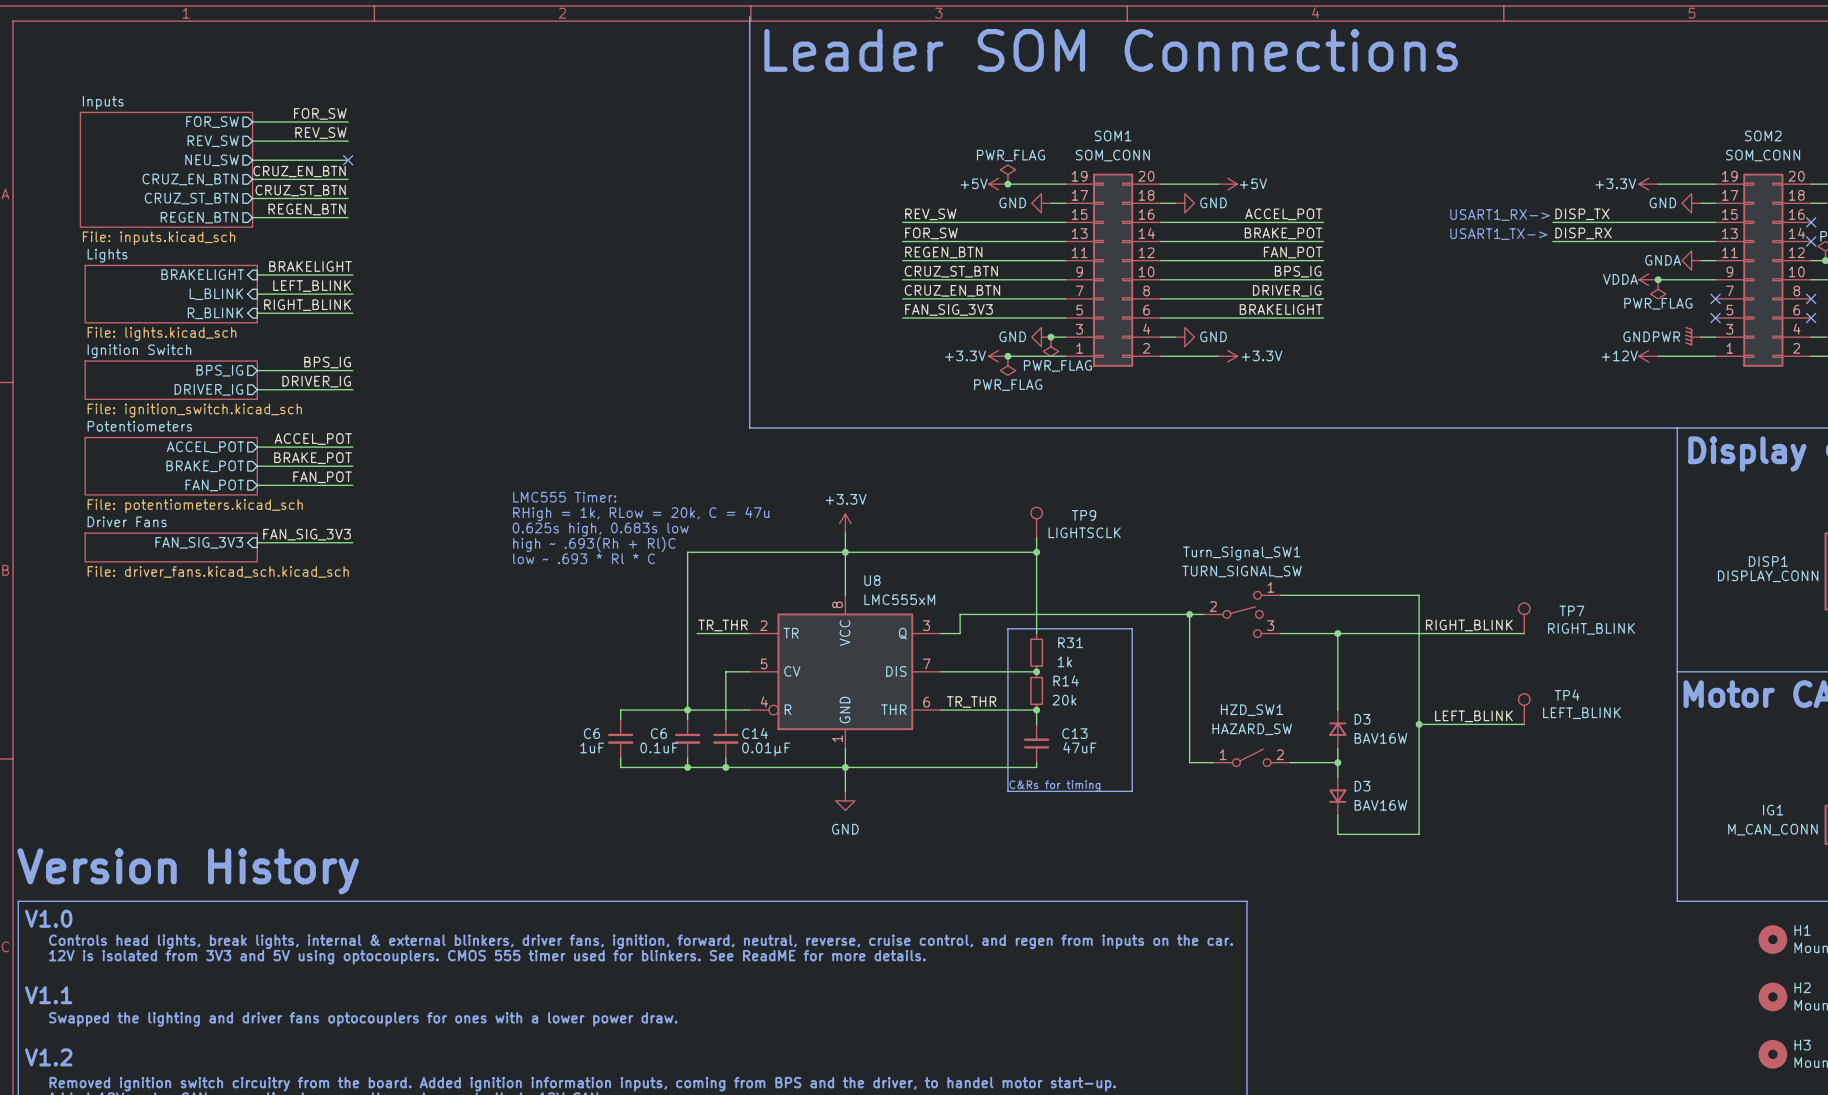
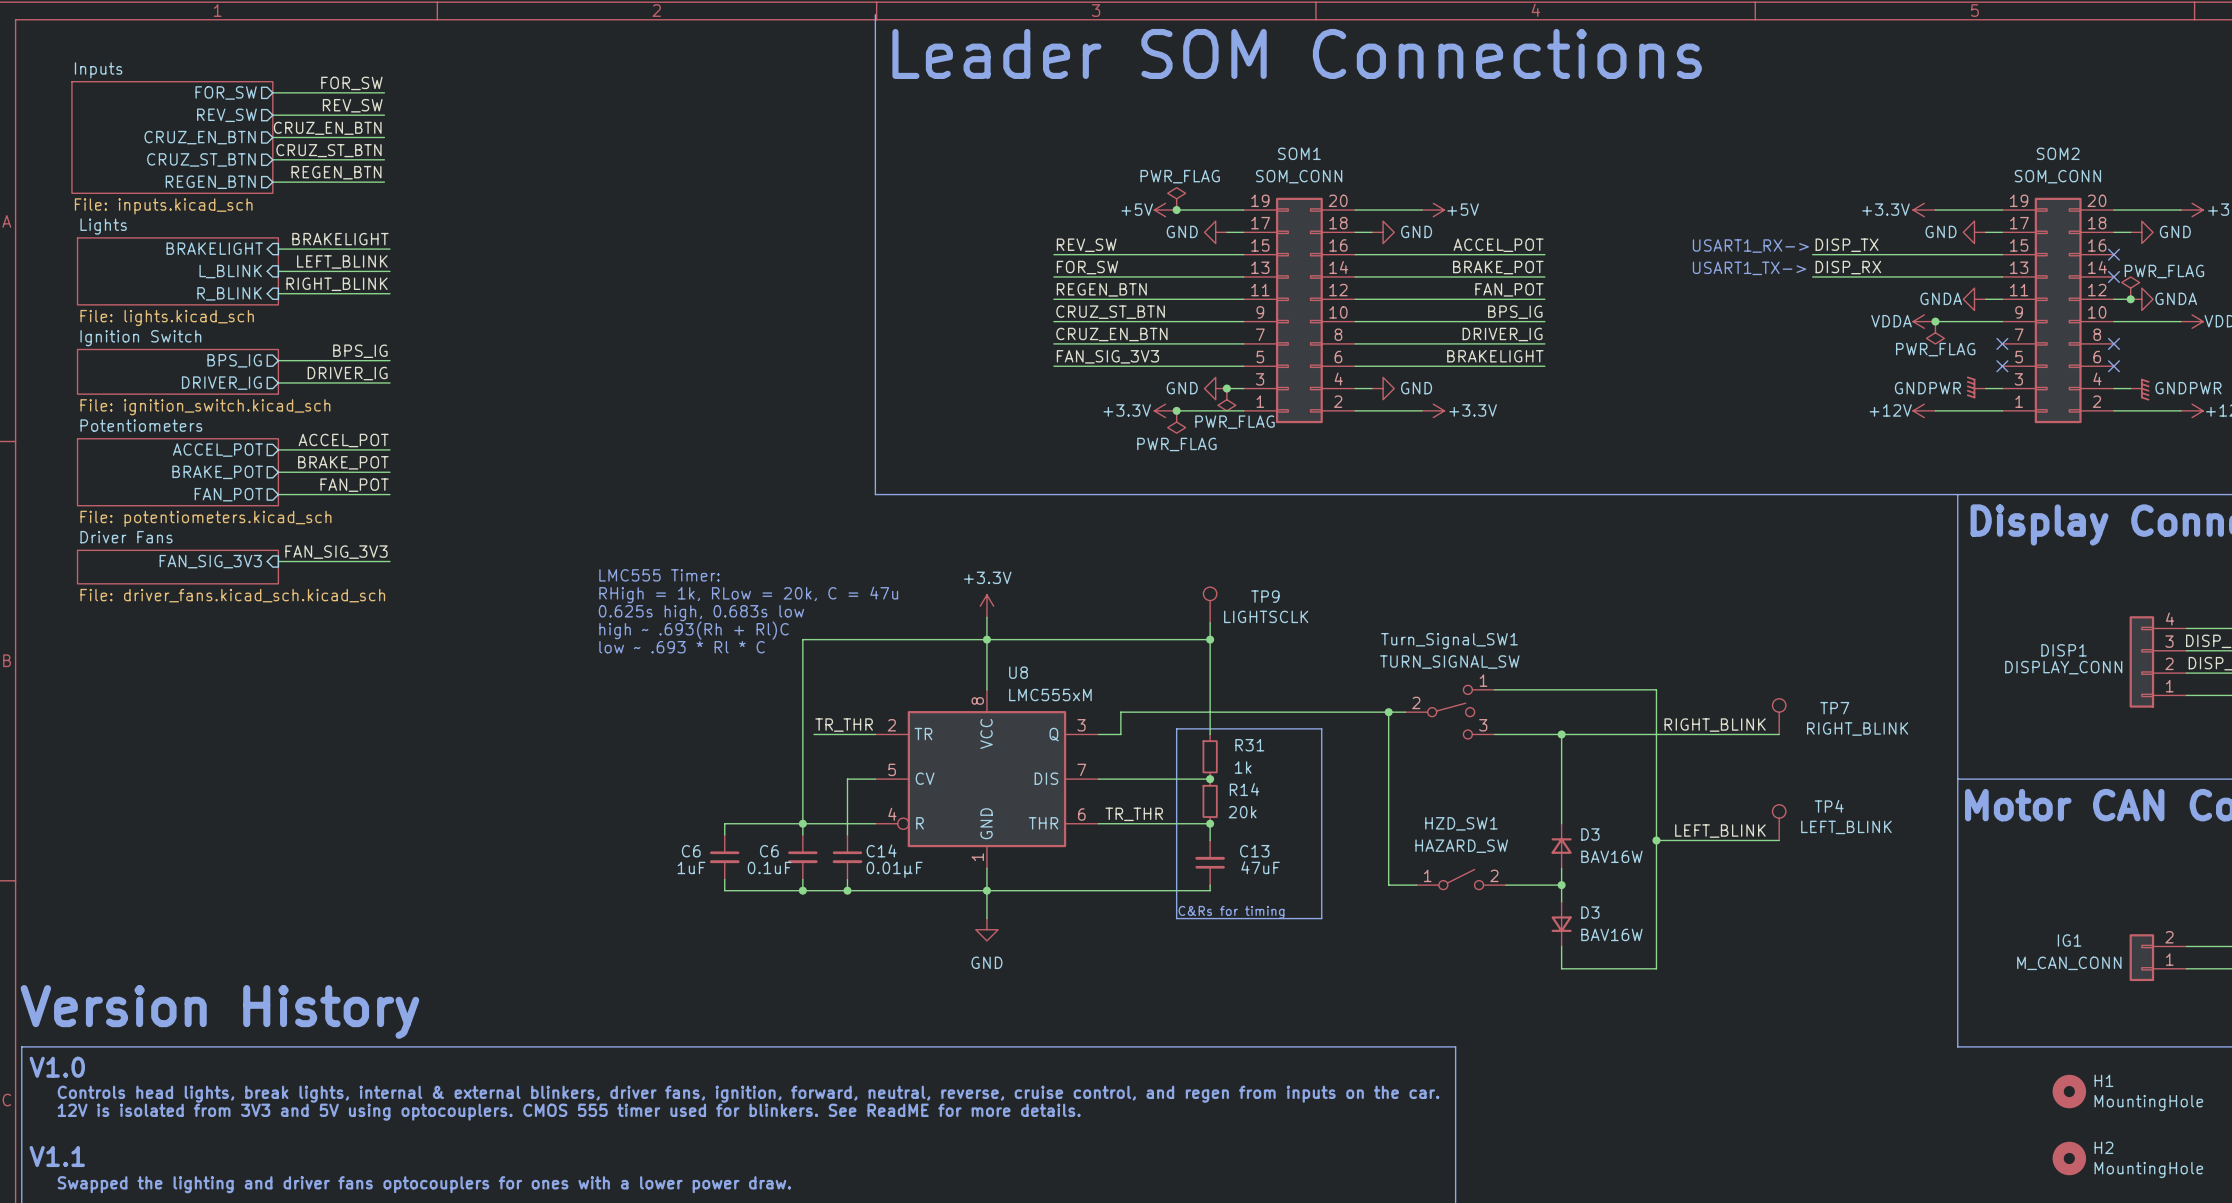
label position: FOR_SW (320, 113) -> FOR_SW (351, 83)
sheet Inputs: none -> File: inputs.kicad_sch (172, 137)
wire: (329, 121) (348, 121) -> (272, 137) (295, 137)
sheet pin position: FOR_SW (212, 122) -> FOR_SW (226, 92)
label position: REV_SW (320, 133) -> REV_SW (352, 105)
sheet pin position: REV_SW (213, 141) -> REV_SW (226, 115)
wire: (329, 141) (348, 141) -> (272, 159) (295, 159)
sheet pin: NEU_SW (212, 160) -> none
wire: (329, 160) (348, 160) -> (272, 182) (295, 182)
no-connect mark: (348, 160) -> none
sheet Inputs: File: inputs.kicad_sch (166, 169) -> none
label position: CRUZ_EN_BTN (299, 171) -> CRUZ_EN_BTN (327, 128)
sheet pin position: CRUZ_EN_BTN (190, 179) -> CRUZ_EN_BTN (200, 137)
wire: (252, 179) (348, 179) -> (272, 115) (384, 115)
label position: CRUZ_ST_BTN (300, 190) -> CRUZ_ST_BTN (328, 150)
sheet pin position: CRUZ_ST_BTN (191, 198) -> CRUZ_ST_BTN (201, 159)
wire: (252, 198) (348, 198) -> (272, 92) (384, 92)
label position: REGEN_BTN (307, 209) -> REGEN_BTN (336, 172)
sheet pin position: REGEN_BTN (199, 217) -> REGEN_BTN (210, 182)
wire: (333, 217) (348, 217) -> (278, 249) (295, 249)
label position: BRAKELIGHT (310, 266) -> BRAKELIGHT (340, 239)
sheet pin position: BRAKELIGHT (202, 274) -> BRAKELIGHT (214, 248)
wire: (257, 274) (352, 274) -> (278, 271) (389, 271)
label position: LEFT_BLINK (312, 286) -> LEFT_BLINK (342, 261)
sheet Lights position: (171, 294) -> (177, 271)
sheet pin position: L_BLINK (216, 294) -> L_BLINK (230, 271)
wire: (257, 294) (352, 294) -> (278, 293) (389, 293)
label position: RIGHT_BLINK (307, 305) -> RIGHT_BLINK (337, 284)
sheet pin position: R_BLINK (215, 313) -> R_BLINK (229, 293)
wire: (333, 313) (352, 313) -> (278, 360) (300, 360)
label position: BPS_IG (327, 362) -> BPS_IG (360, 351)
sheet pin position: BPS_IG (219, 370) -> BPS_IG (234, 360)
wire: (257, 370) (352, 370) -> (278, 382) (389, 382)
sheet Ignition Switch position: (171, 380) -> (177, 371)
label position: DRIVER_IG (316, 381) -> DRIVER_IG (347, 373)
sheet pin position: DRIVER_IG (208, 389) -> DRIVER_IG (221, 383)
wire: (333, 389) (352, 389) -> (278, 449) (300, 449)
label position: ACCEL_POT (313, 439) -> ACCEL_POT (343, 440)
sheet pin position: ACCEL_POT (205, 447) -> ACCEL_POT (217, 450)
wire: (257, 447) (352, 447) -> (278, 472) (389, 472)
label position: BRAKE_POT (313, 458) -> BRAKE_POT (343, 462)
sheet Potentiometers position: (171, 466) -> (177, 472)
sheet pin position: BRAKE_POT (205, 466) -> BRAKE_POT (217, 472)
wire: (257, 466) (352, 466) -> (278, 494) (389, 494)
label position: FAN_POT (322, 477) -> FAN_POT (354, 485)
sheet pin position: FAN_POT (214, 485) -> FAN_POT (228, 494)
wire: (333, 485) (352, 485) -> (278, 561) (300, 561)
label position: FAN_SIG_3V3 (307, 534) -> FAN_SIG_3V3 (336, 552)
sheet pin position: FAN_SIG_3V3 (199, 542) -> FAN_SIG_3V3 (210, 561)
wire: (257, 542) (352, 542) -> none
sheet Driver Fans position: (171, 547) -> (177, 567)

